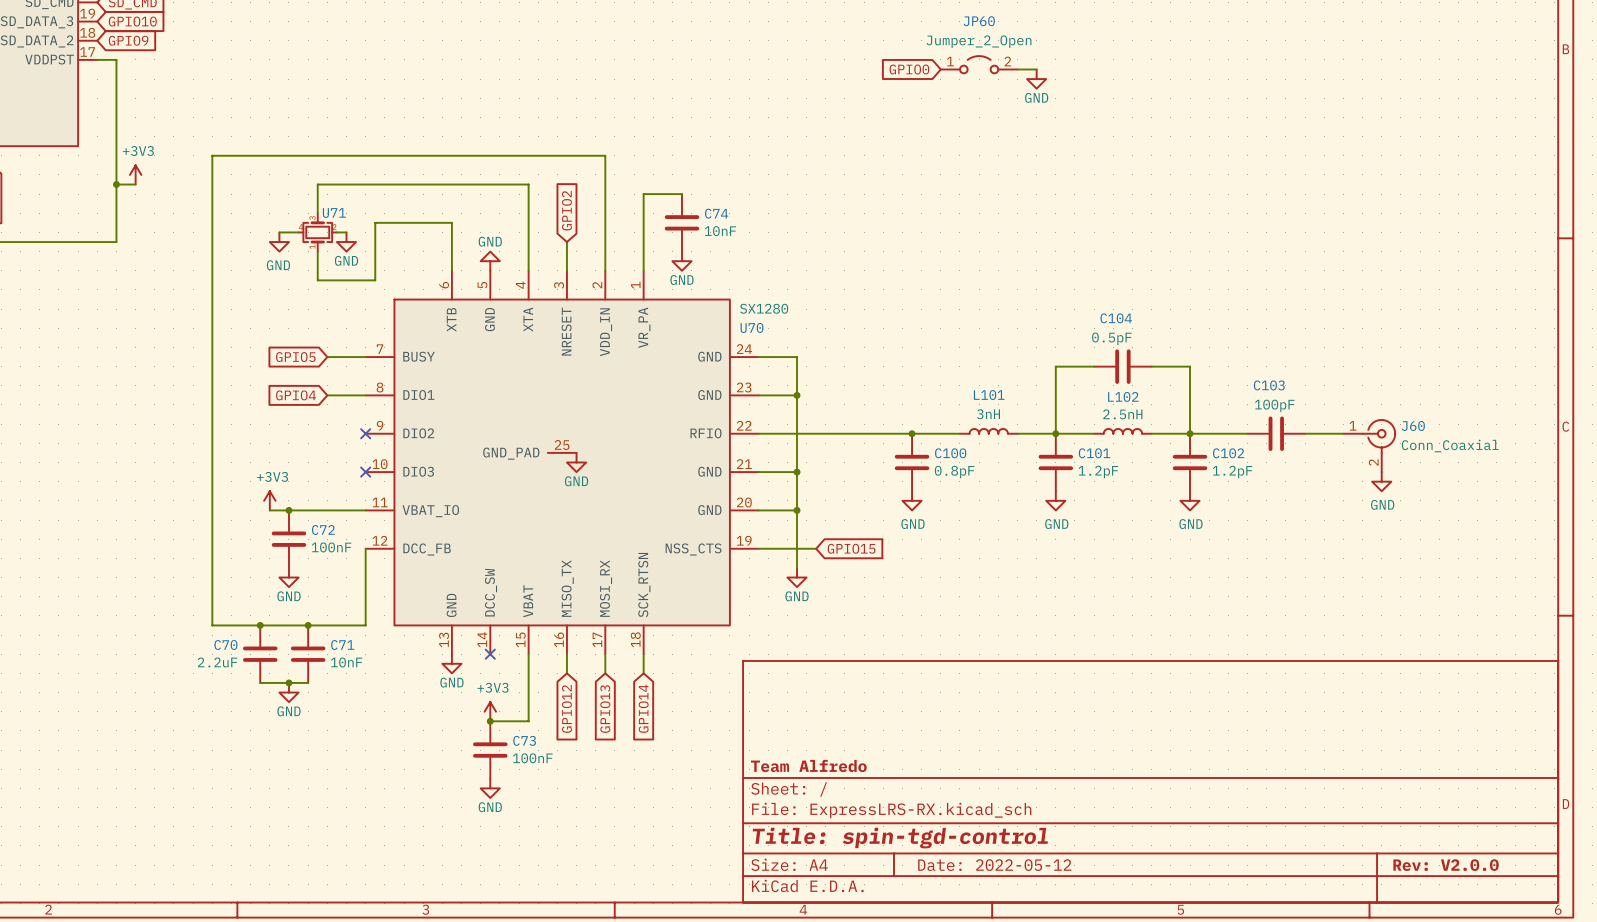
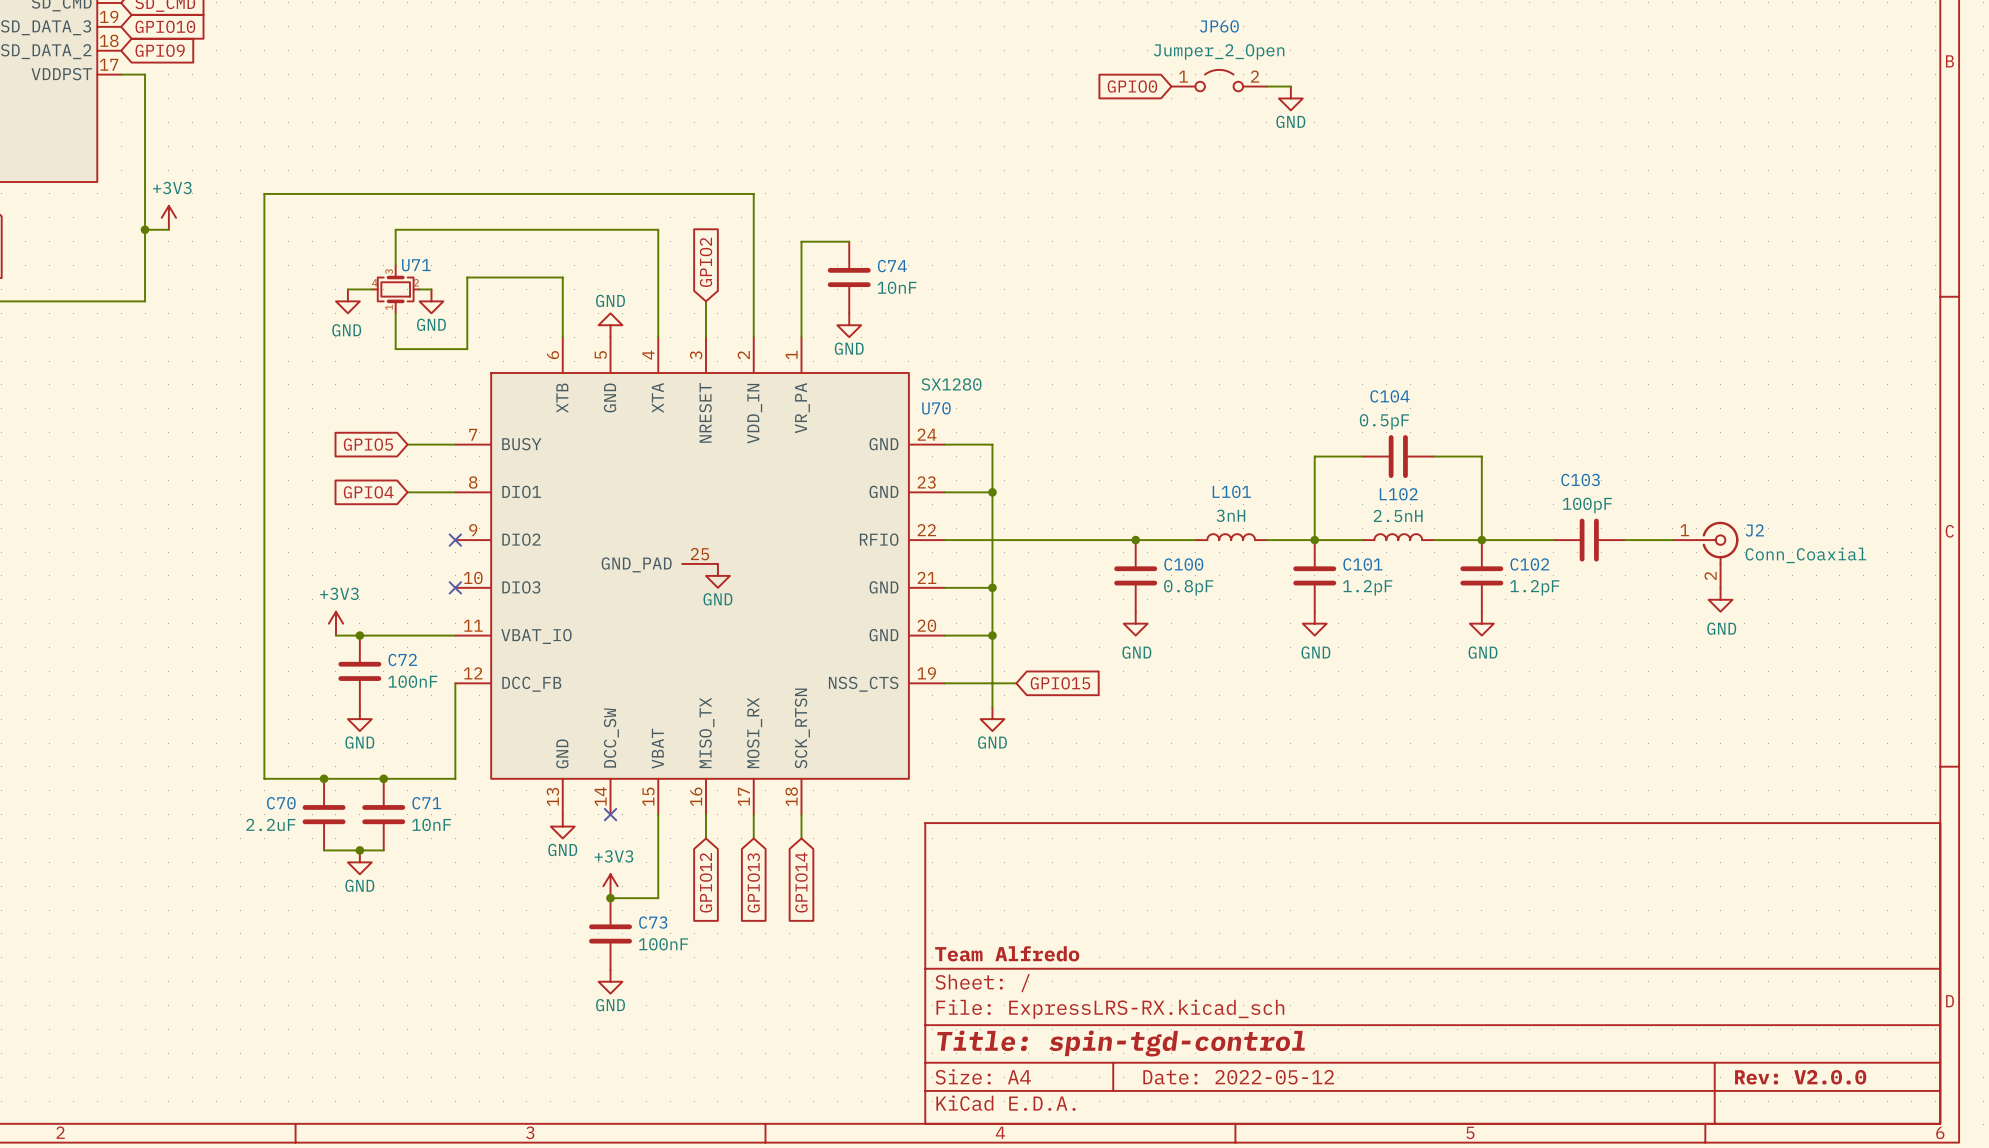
J60 name: J60 (1413, 426) -> J2 (1754, 530)

